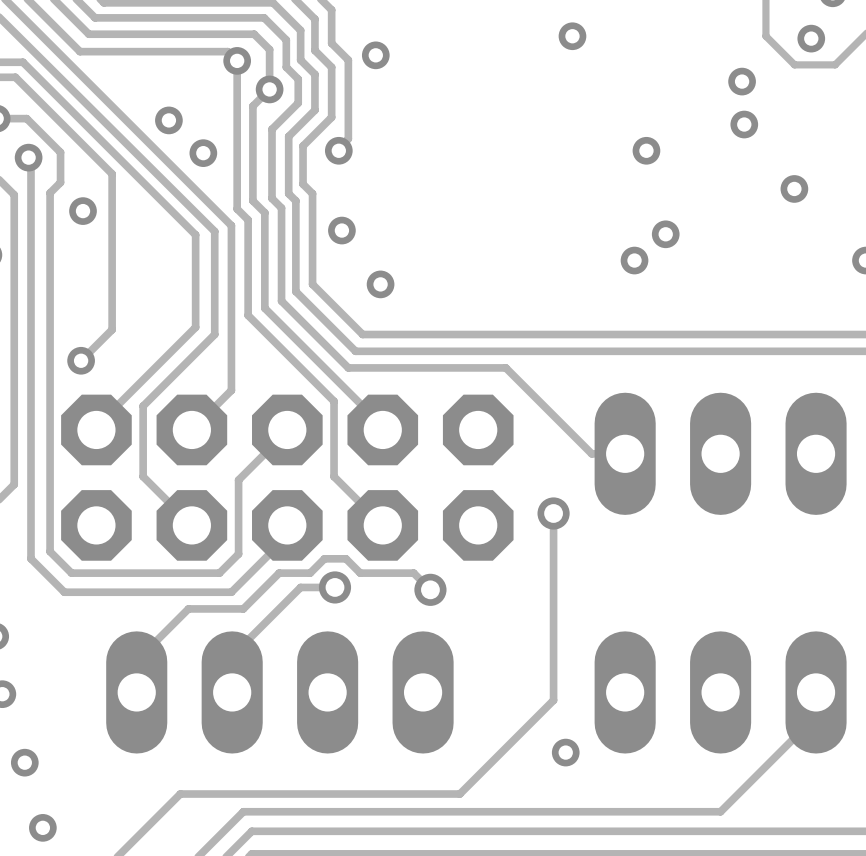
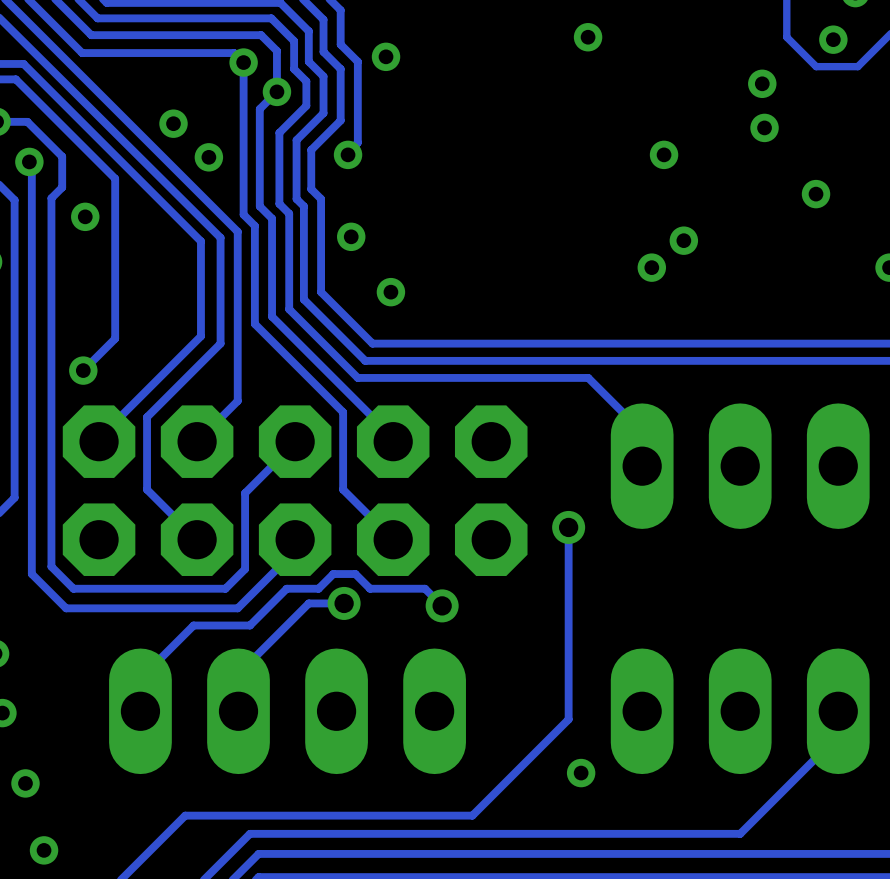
track: (505, 367) (591, 453) (625, 453) -> (519, 377) (588, 377) (642, 431) (642, 466)

